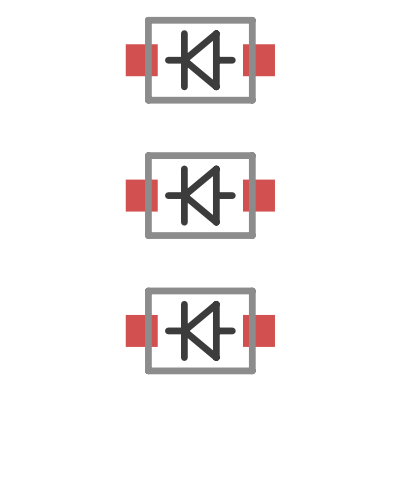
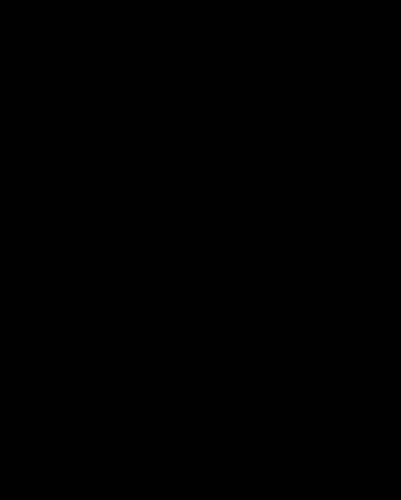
part: (200, 60) -> none
part: (200, 195) -> none
part: (200, 330) -> none

